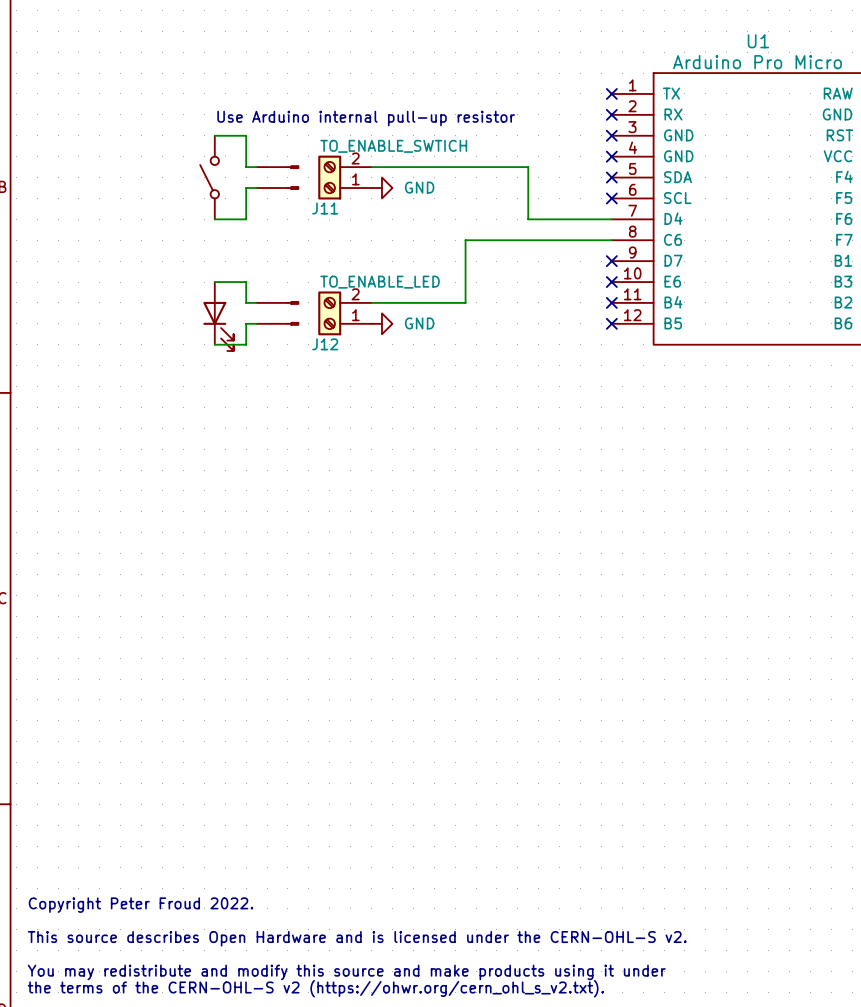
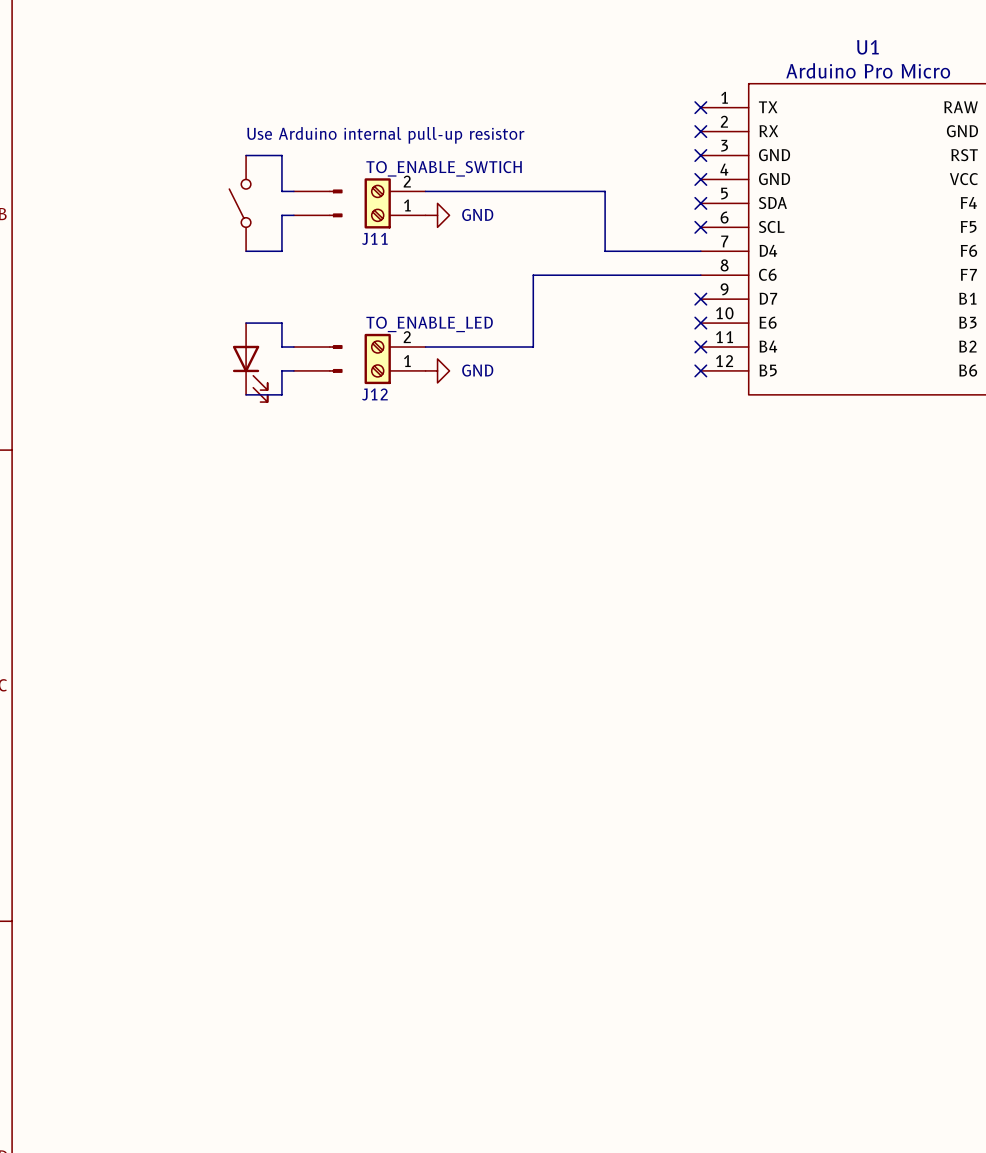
text: Copyright Peter Froud 2022. (141, 905) -> none
text: This source describes Open Hardware and is licensed under the CERN-OHL-S v2. (357, 938) -> none
text: You may redistribute and modify this source and make products using it under (346, 972) -> none
text: the terms of the CERN-OHL-S v2 (https://ohwr.org/cern_ohl_s_v2.txt). (315, 988) -> none

